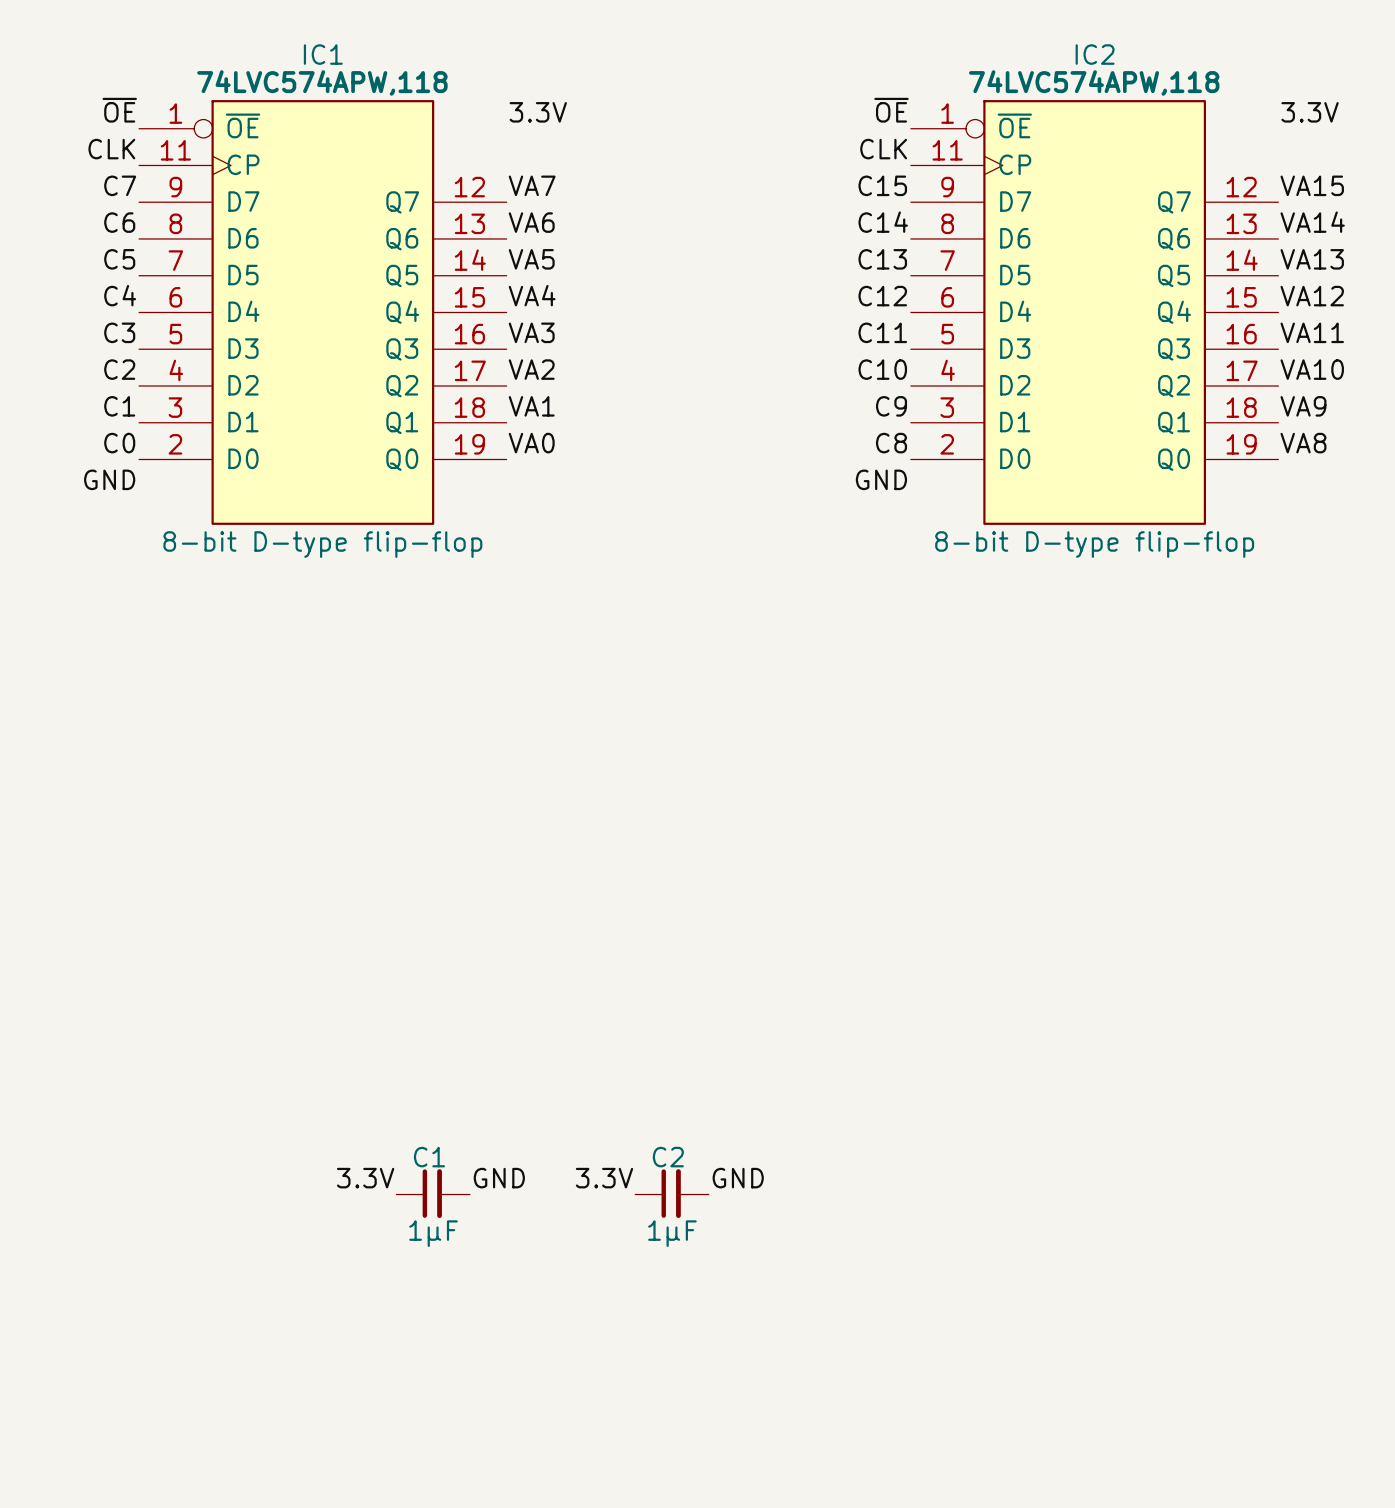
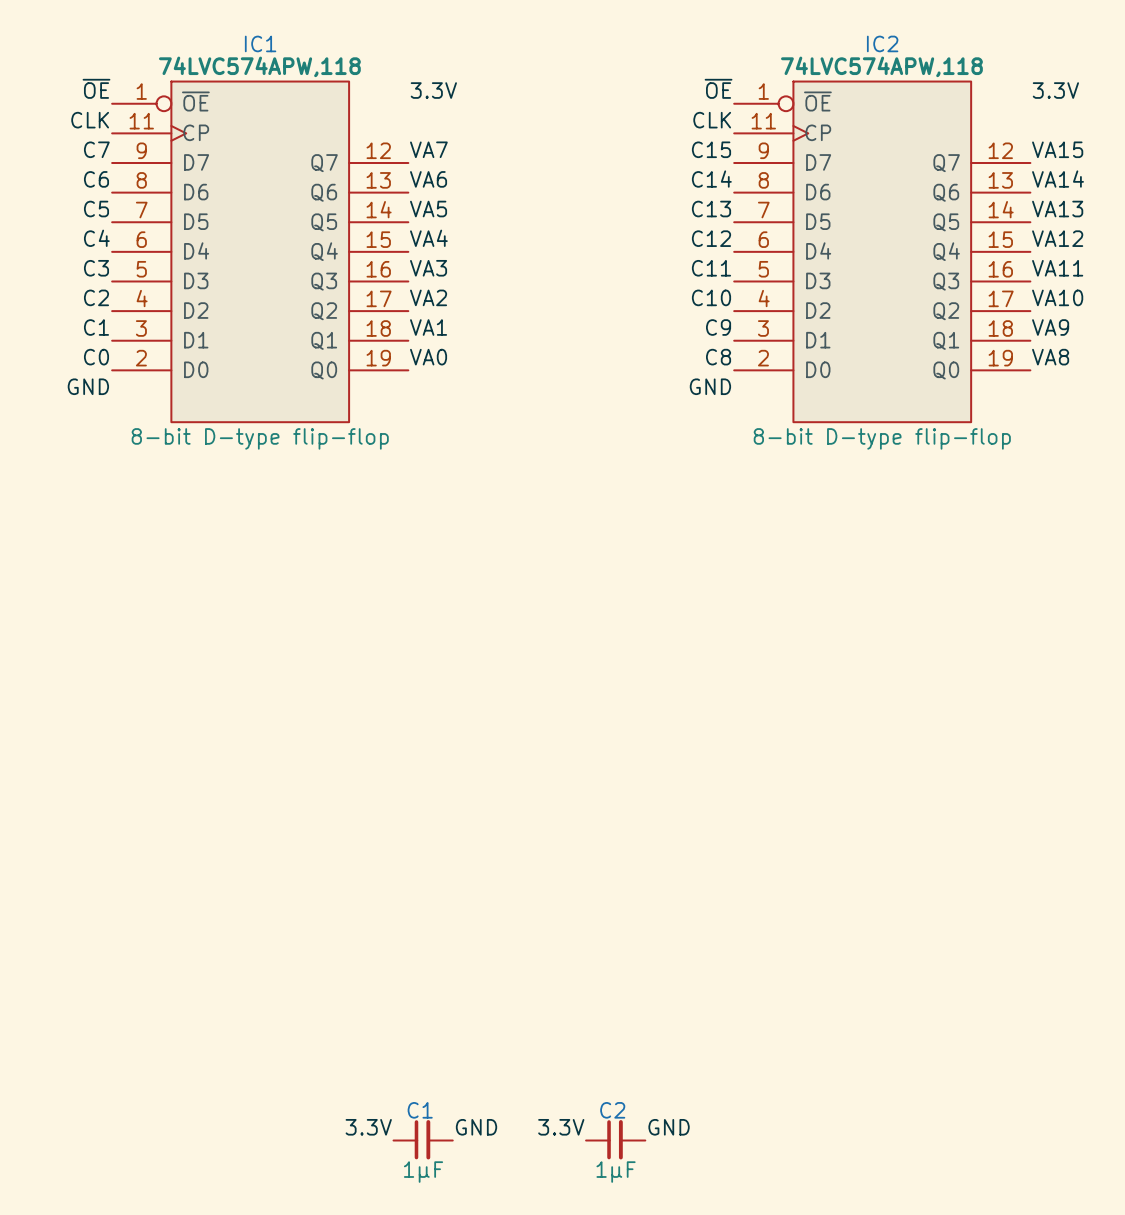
label: 3.3V (365, 1178) -> none
label: GND (499, 1178) -> none
label: 3.3V (604, 1178) -> none
label: GND (738, 1178) -> none
C1 position: (433, 1193) -> (423, 1139)
C2 position: (672, 1193) -> (615, 1139)
label: none -> 3.3V (368, 1127)
label: none -> GND (476, 1127)
label: none -> 3.3V (561, 1127)
label: none -> GND (669, 1127)

